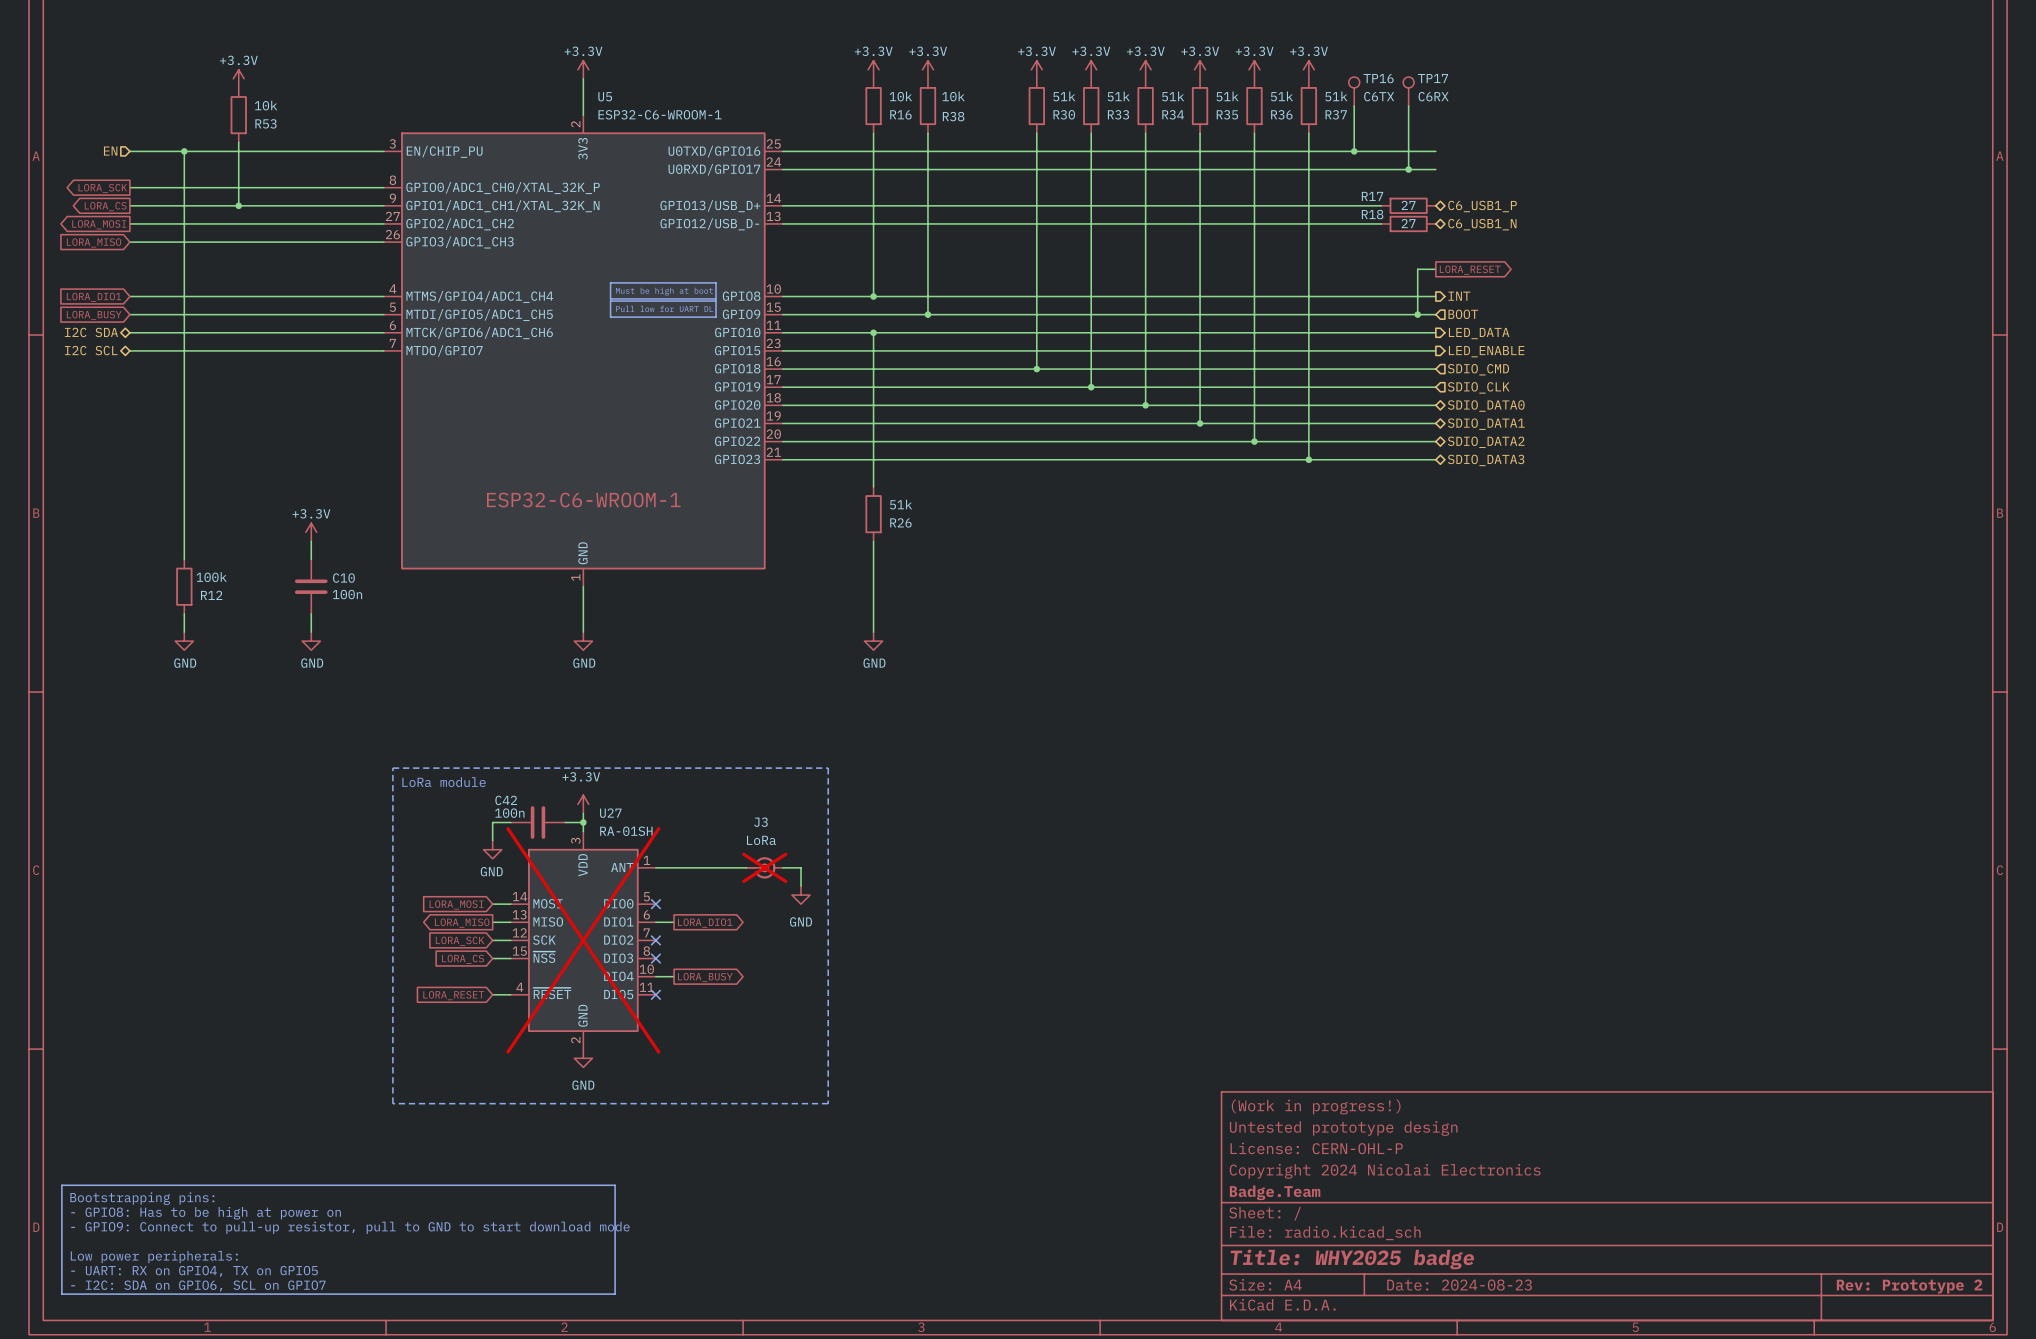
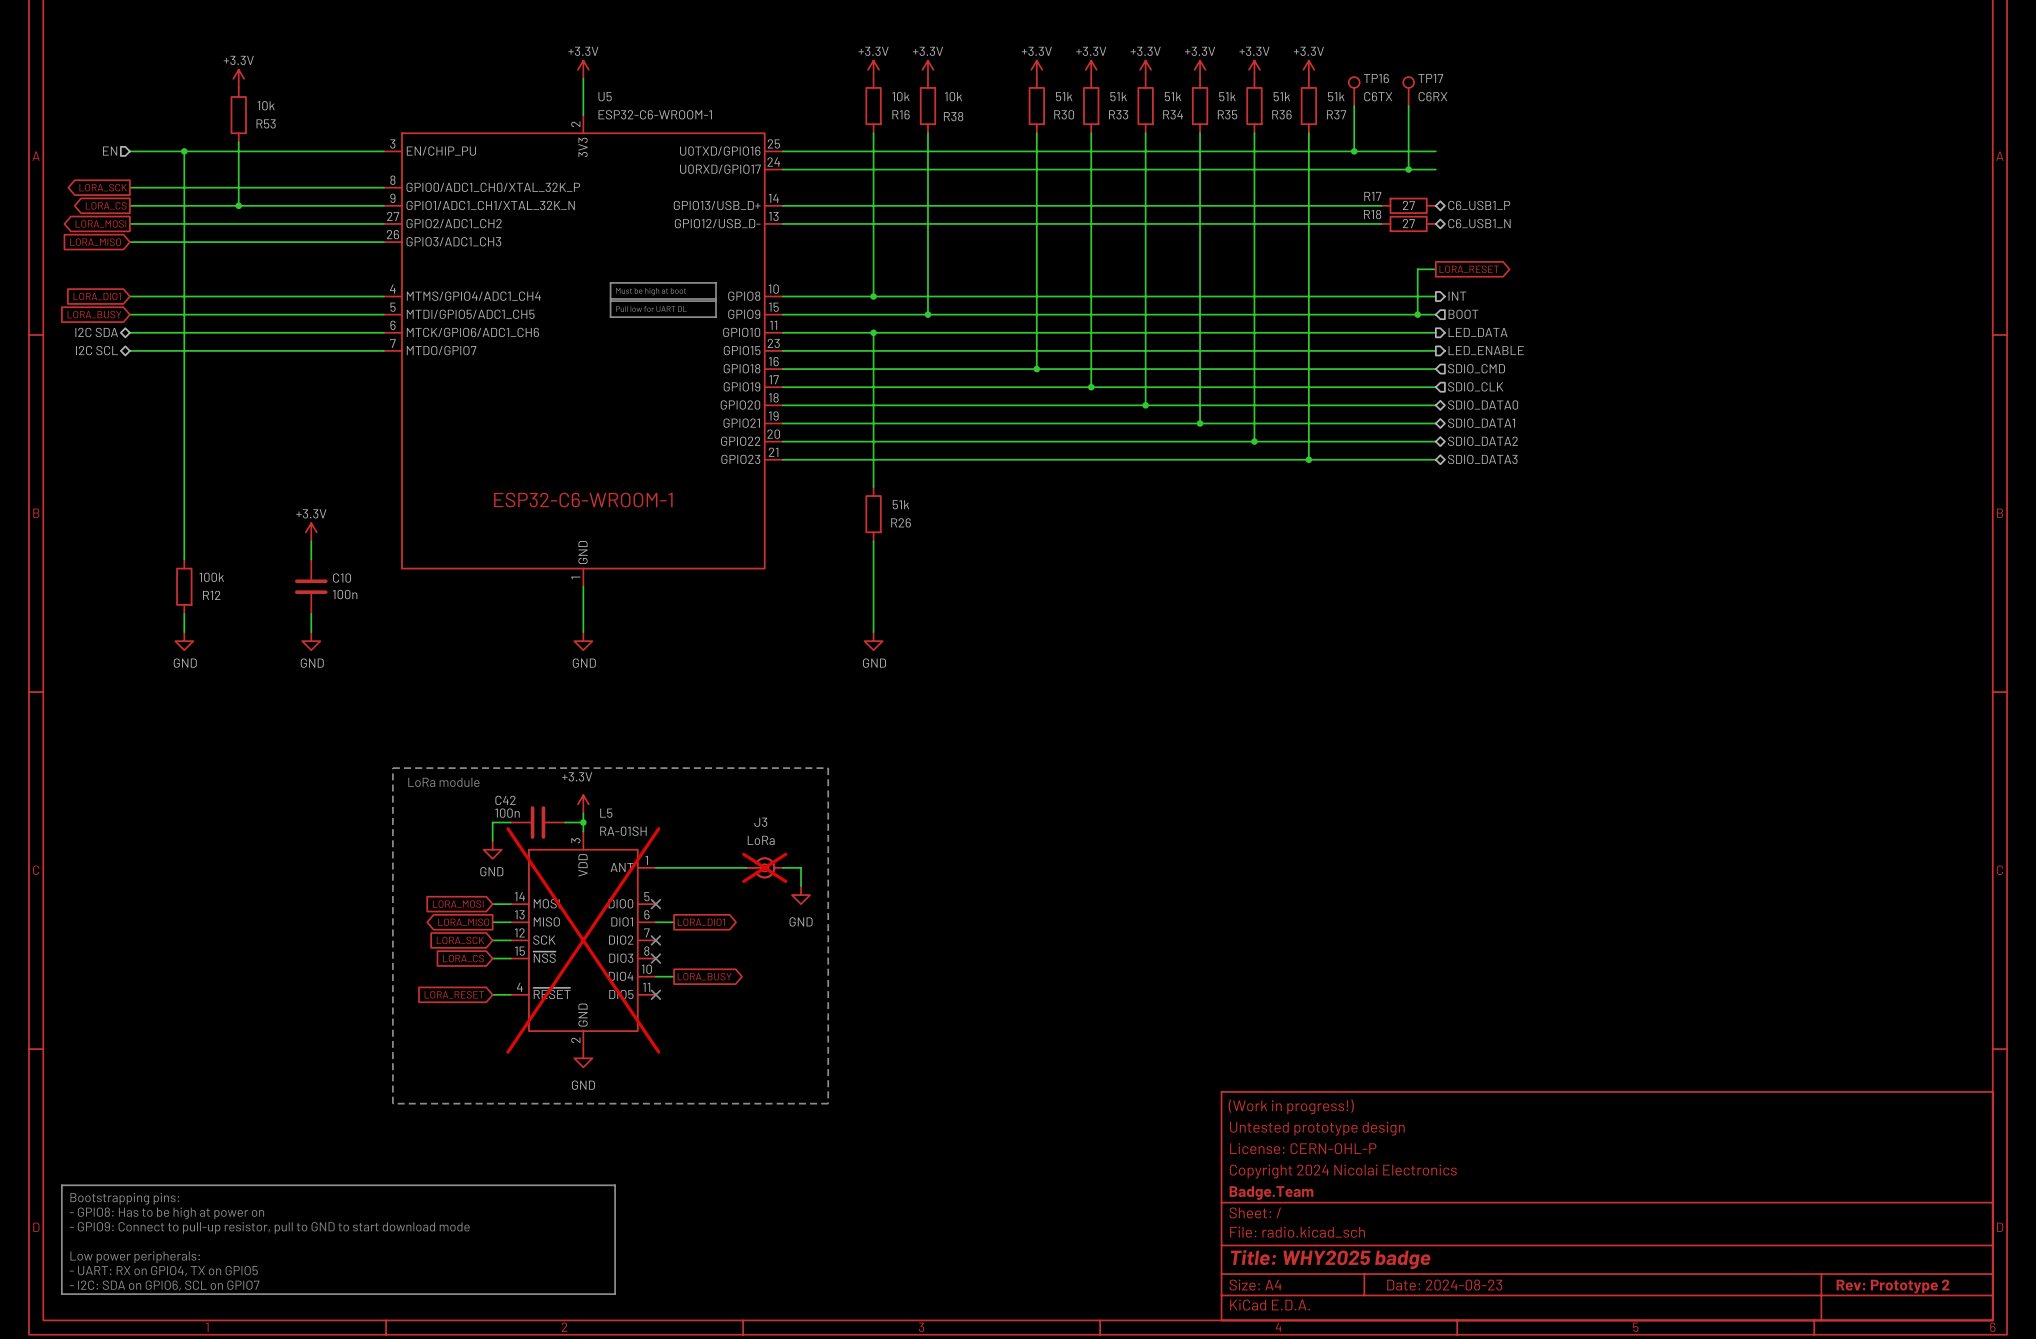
U27 name: U27 (610, 813) -> L5 (606, 813)

